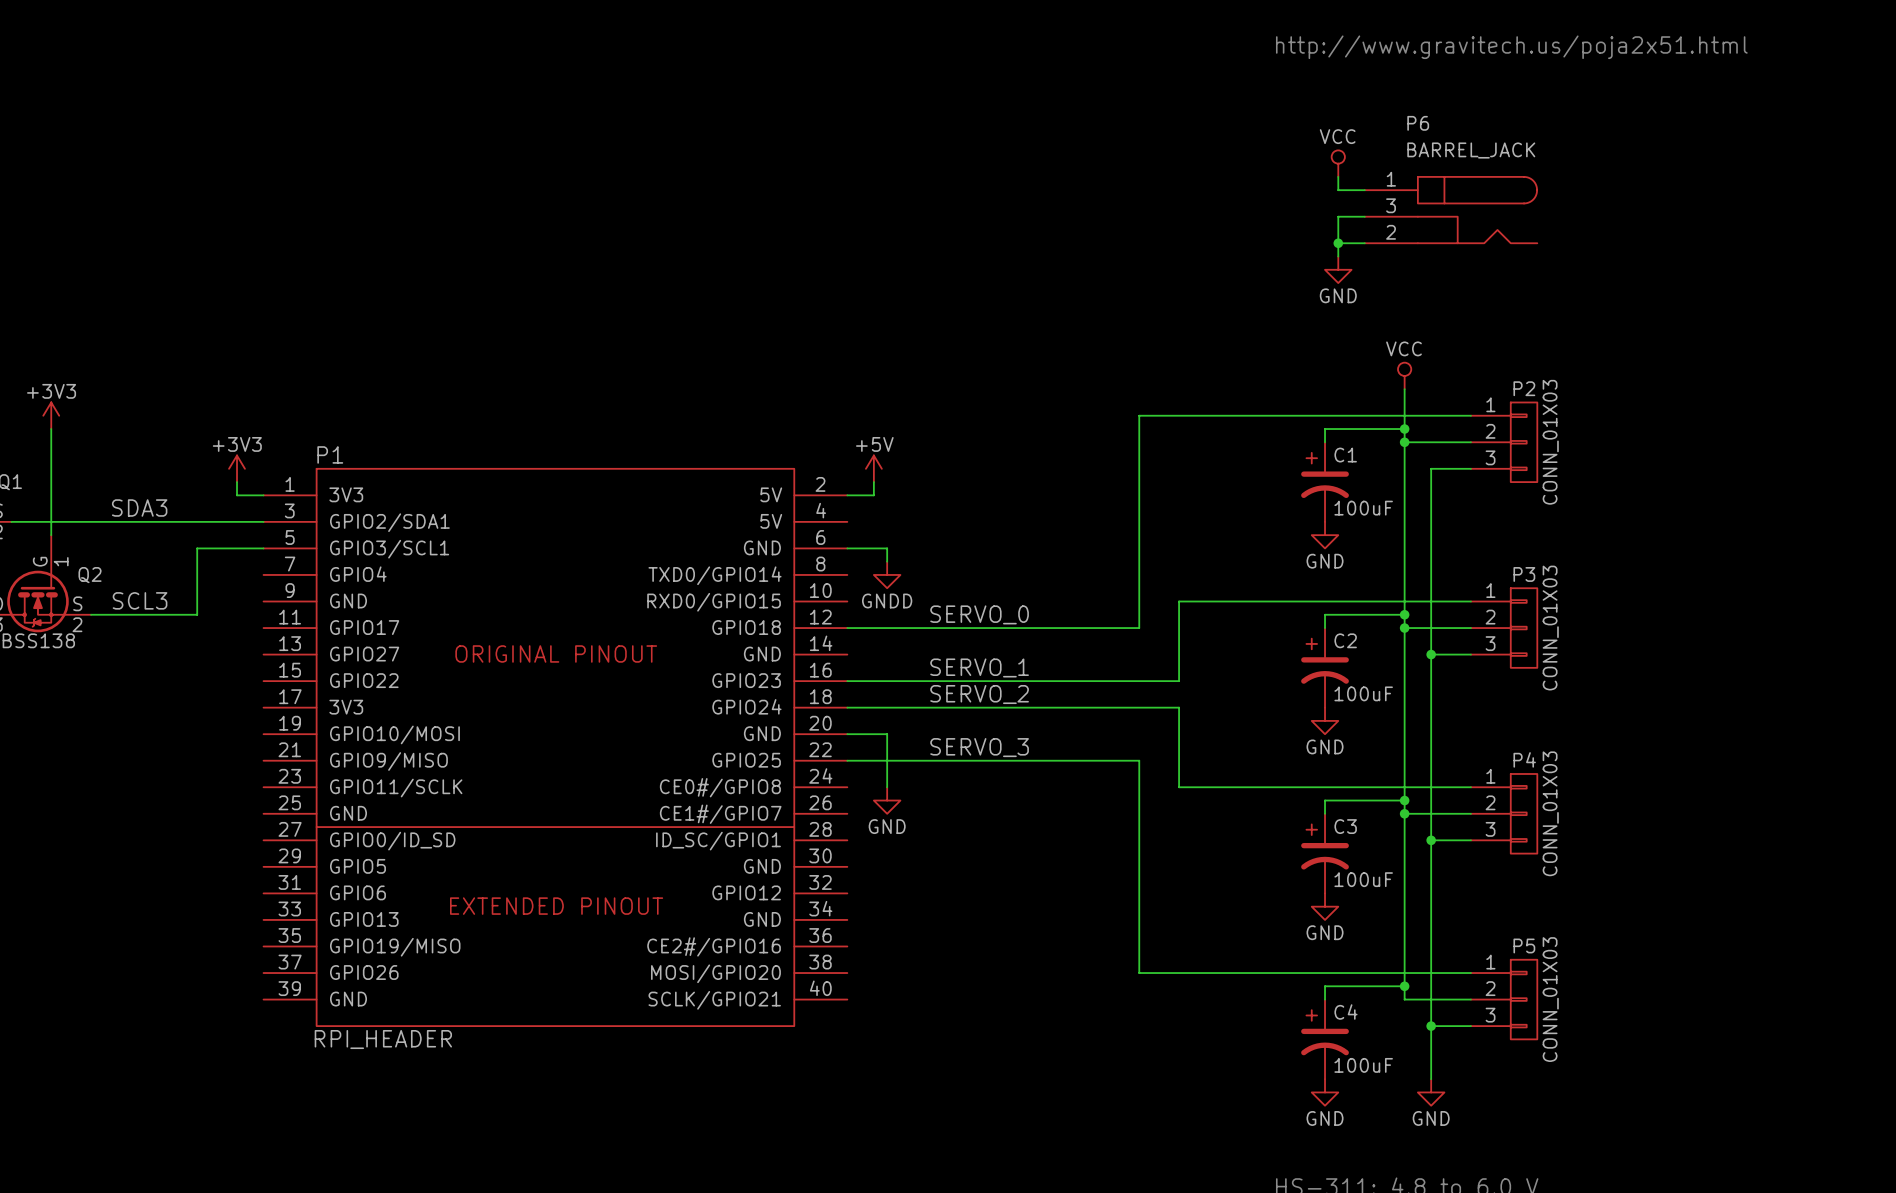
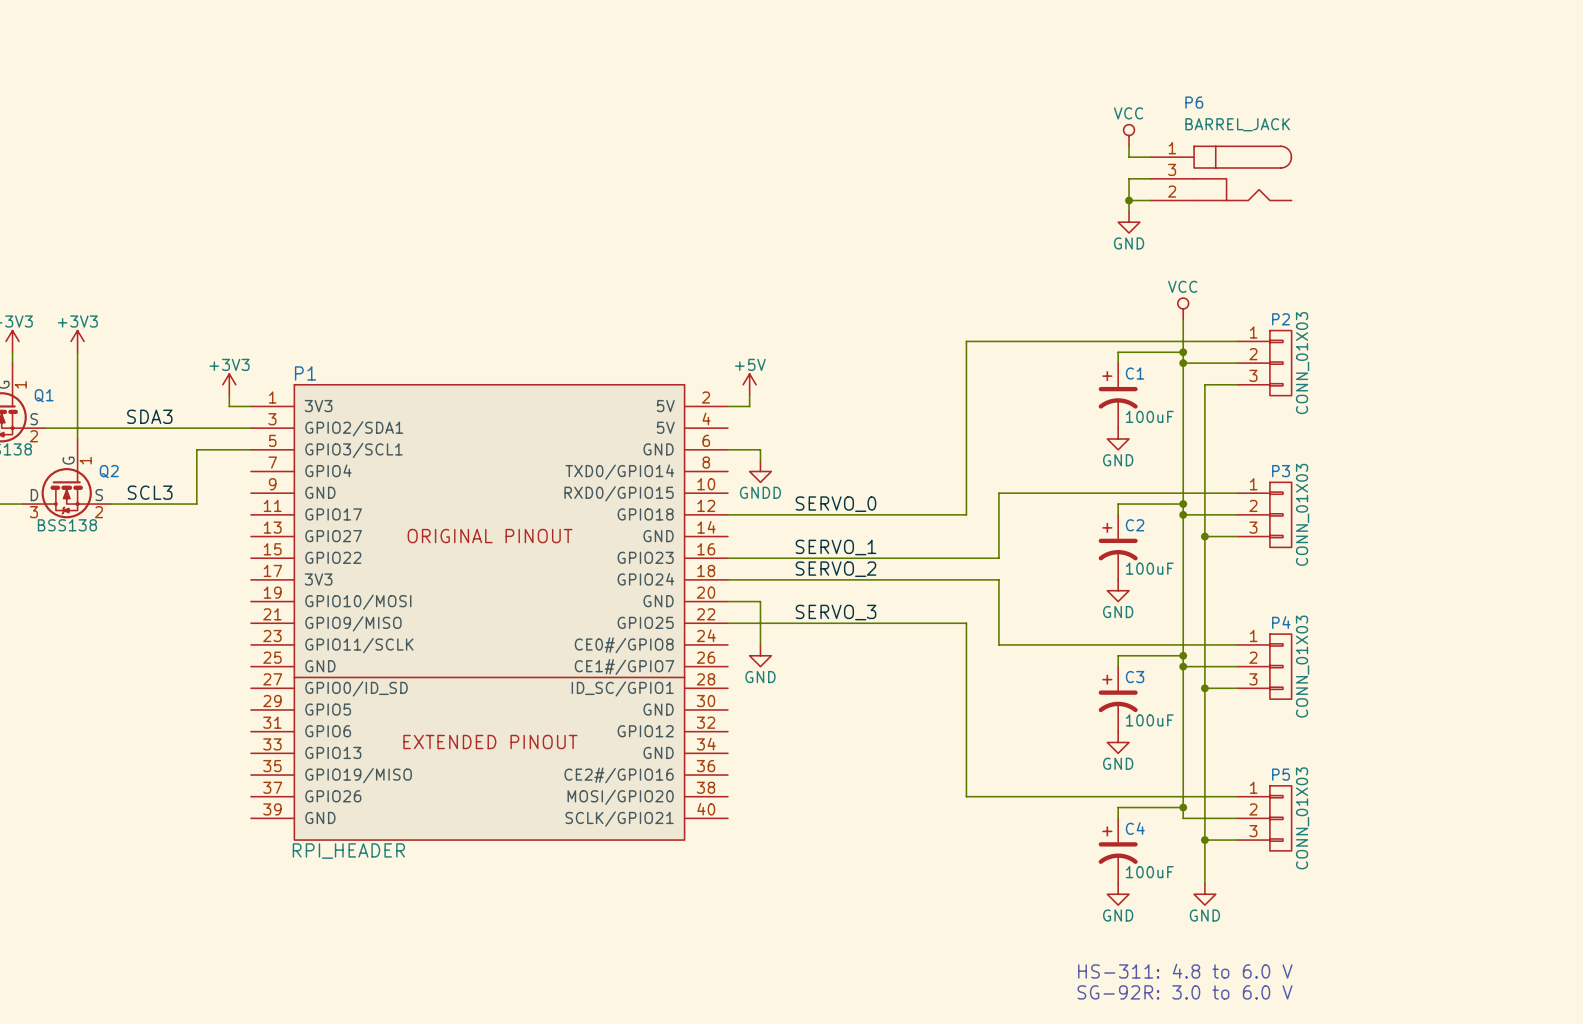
text: http://www.gravitech.us/poja2x51.html (1511, 47) -> none

